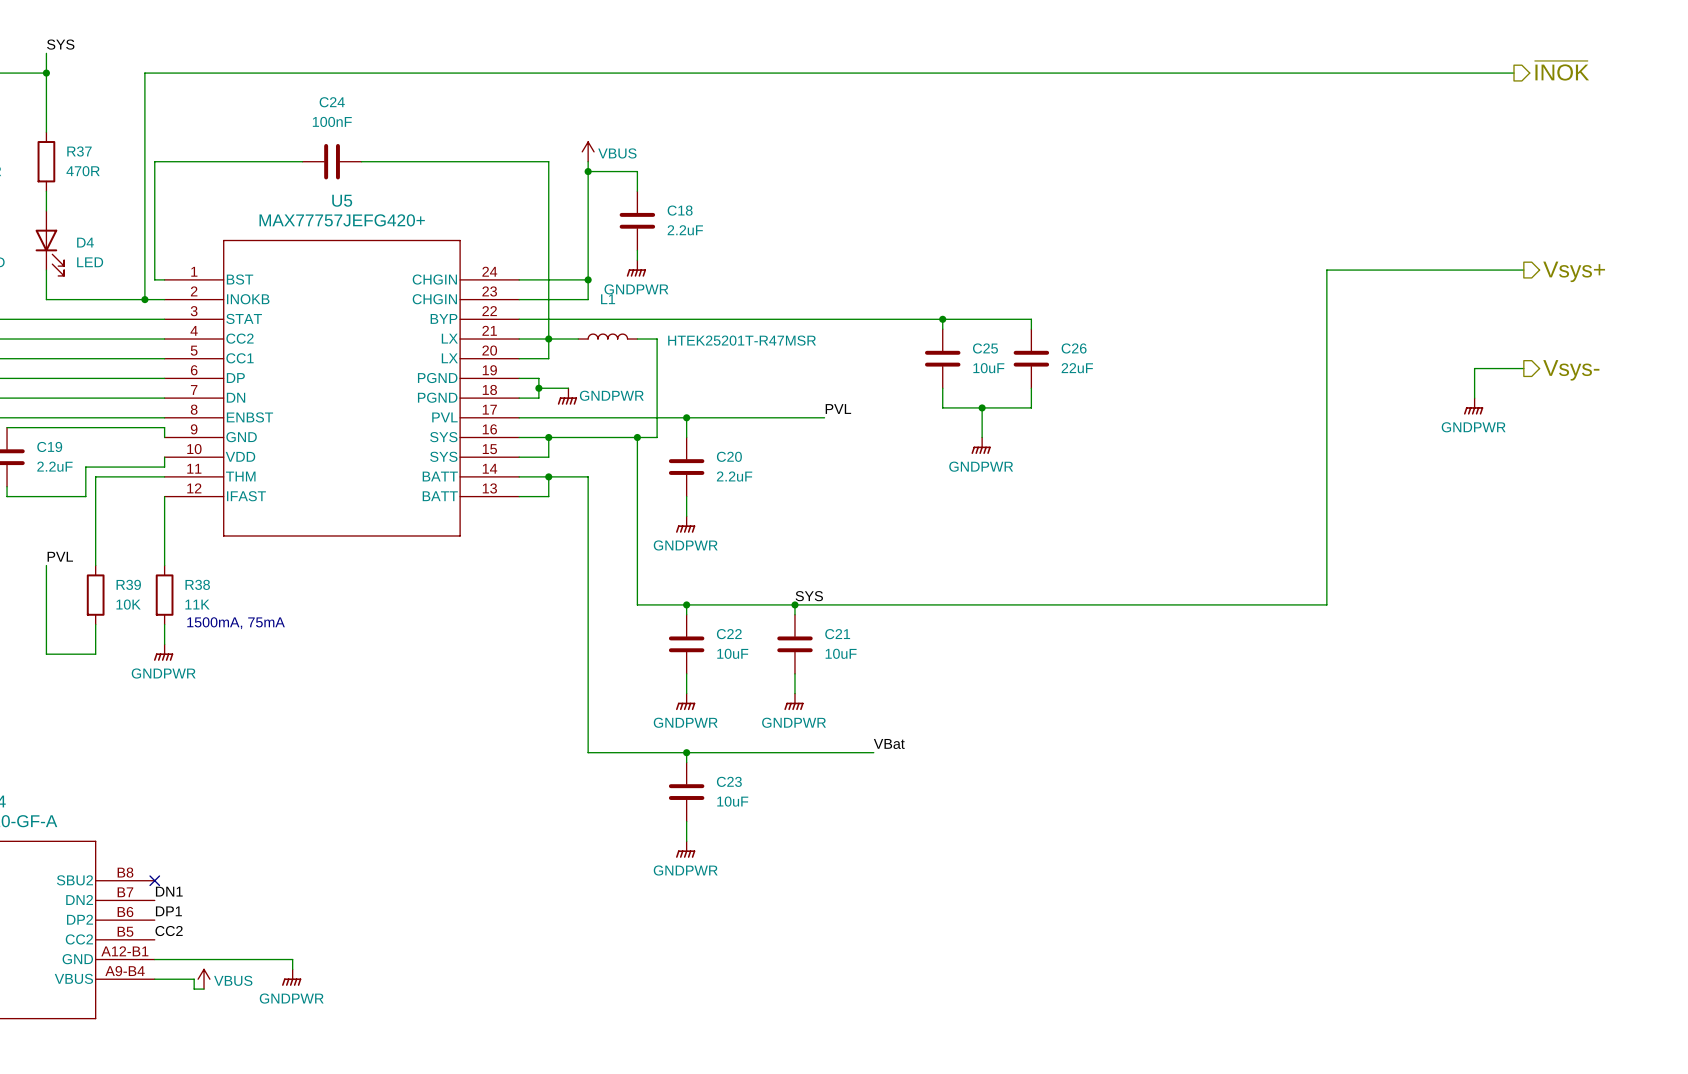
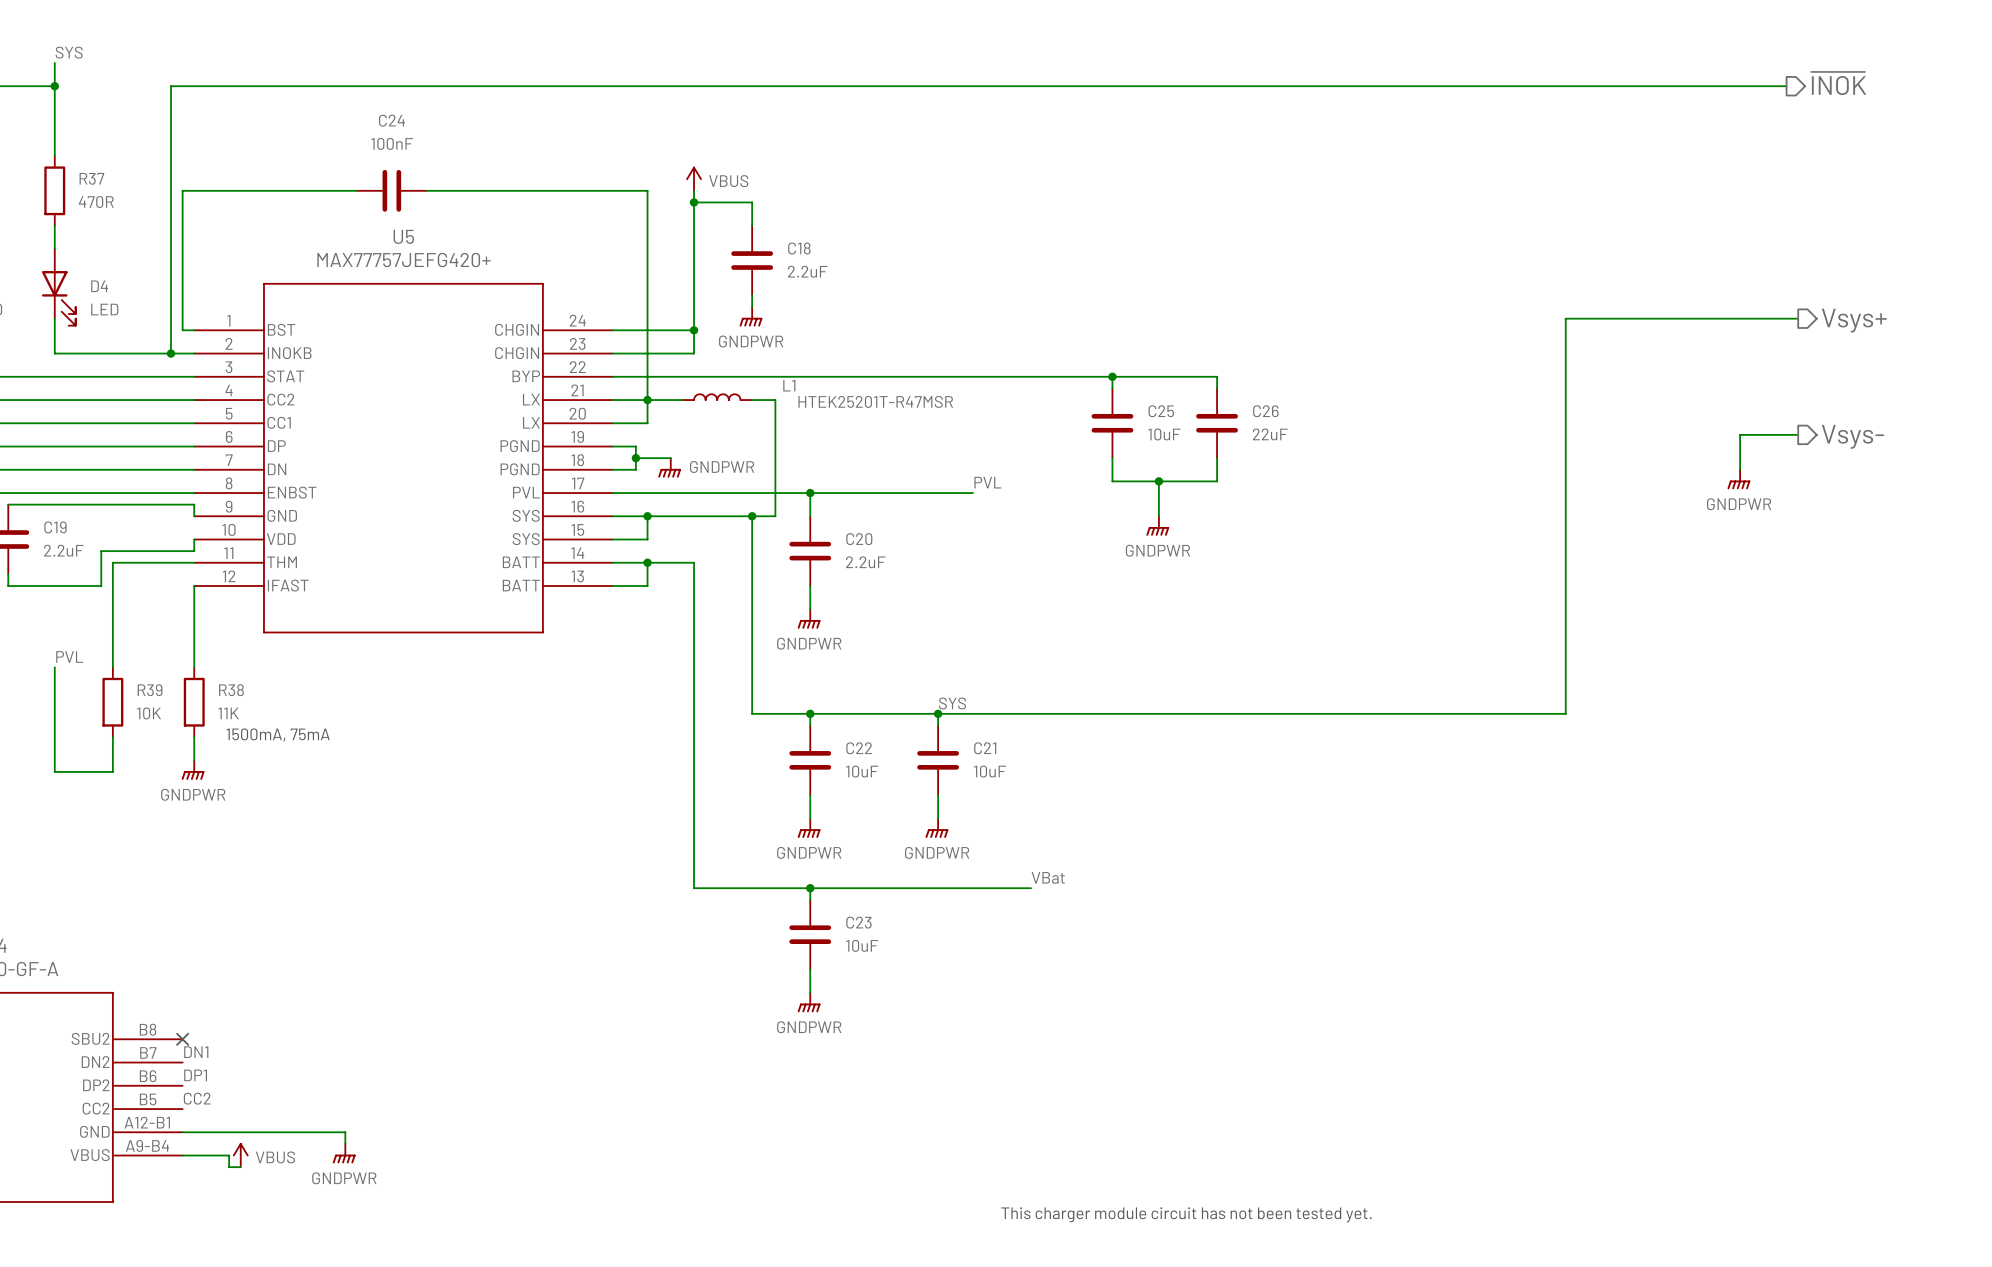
L1 name position: L1 (608, 299) -> L1 (789, 385)
text: none -> This charger module circuit has not been tested yet. (1186, 1214)

